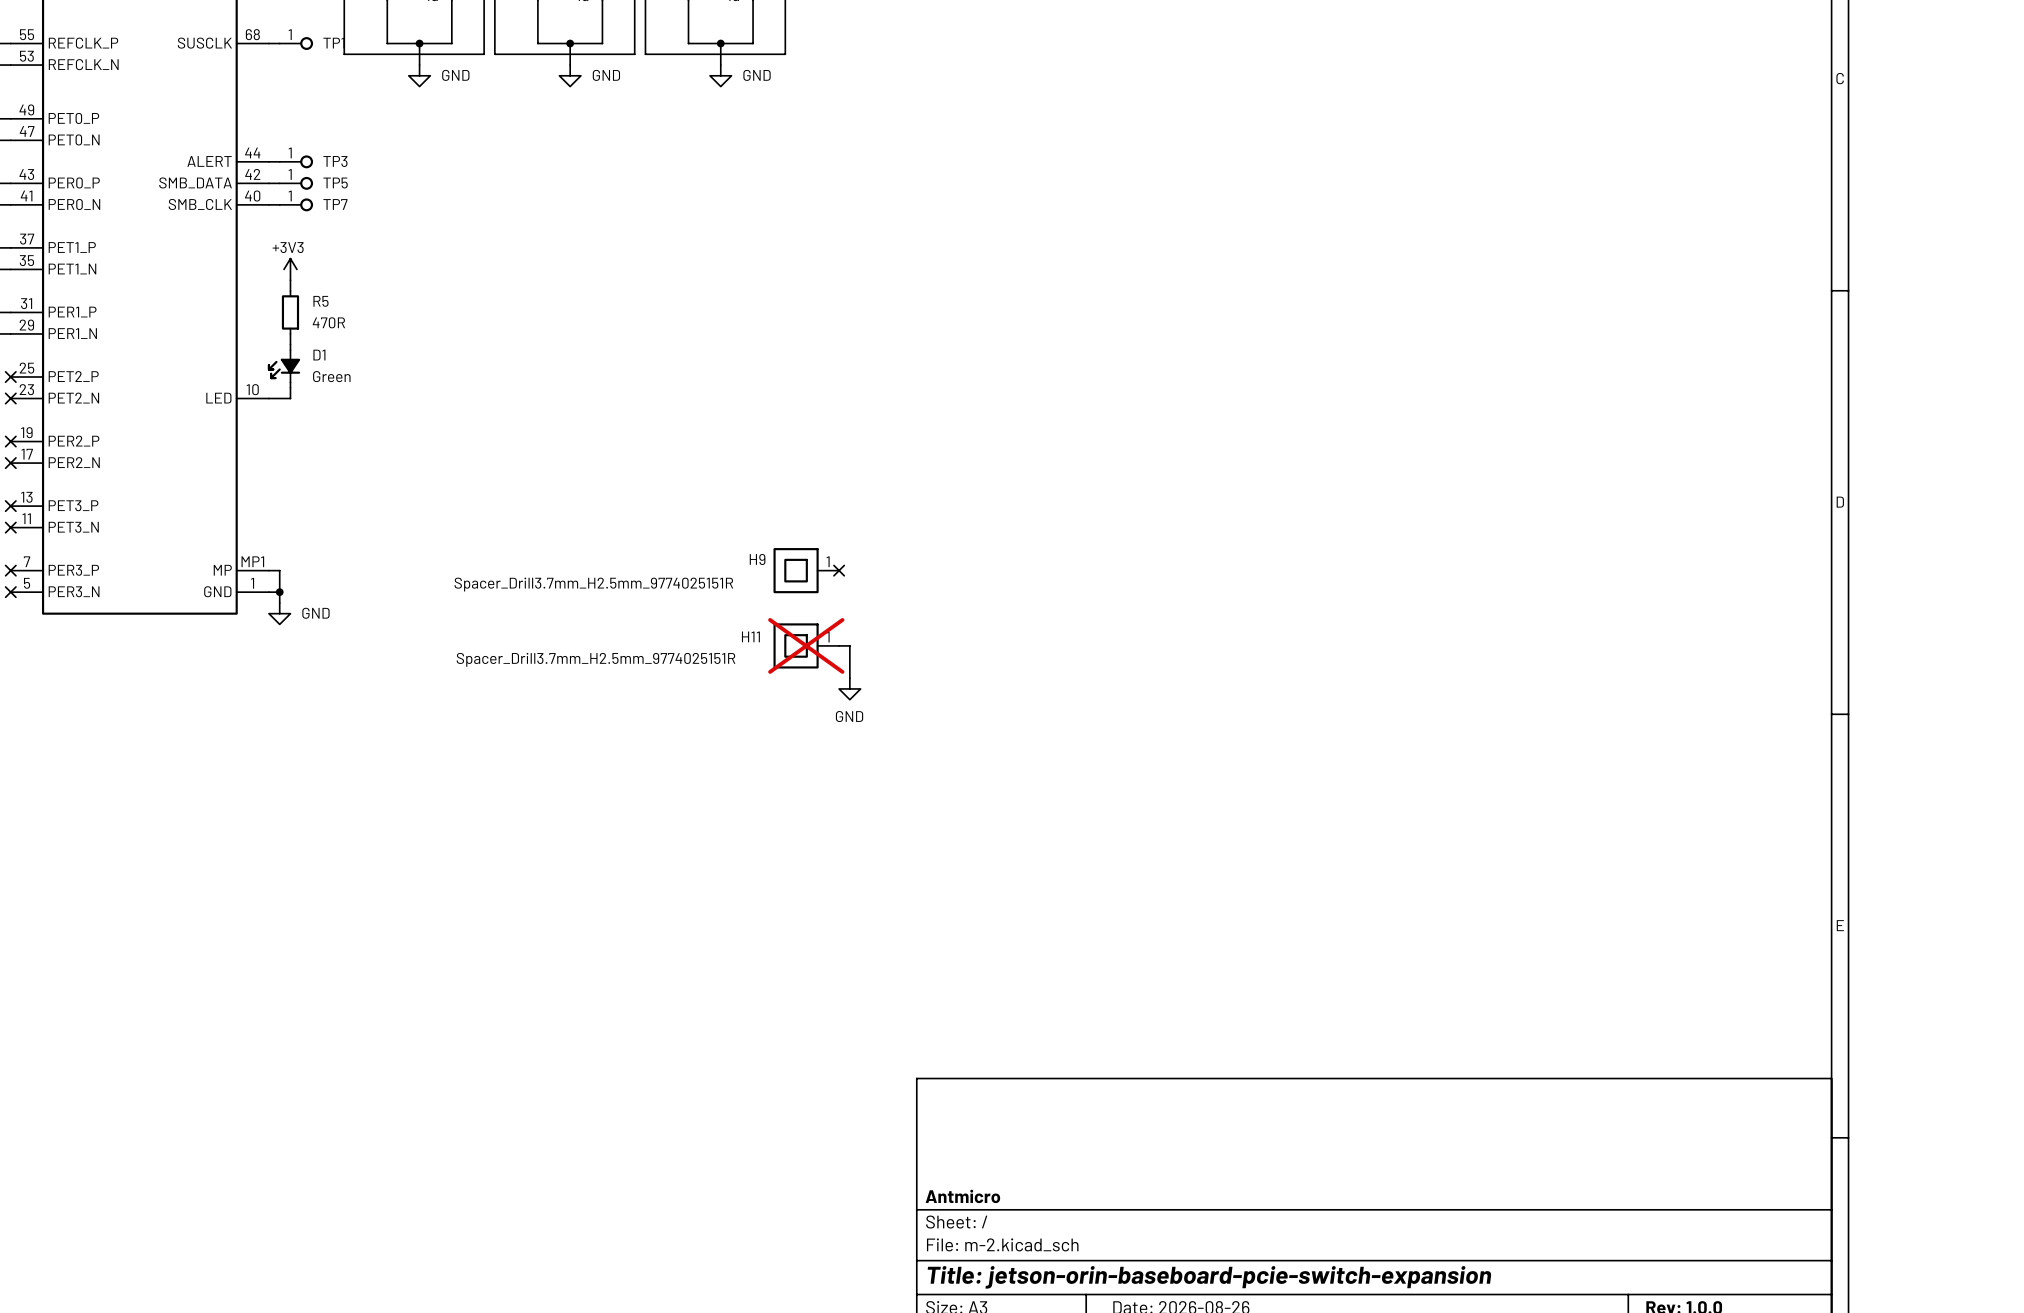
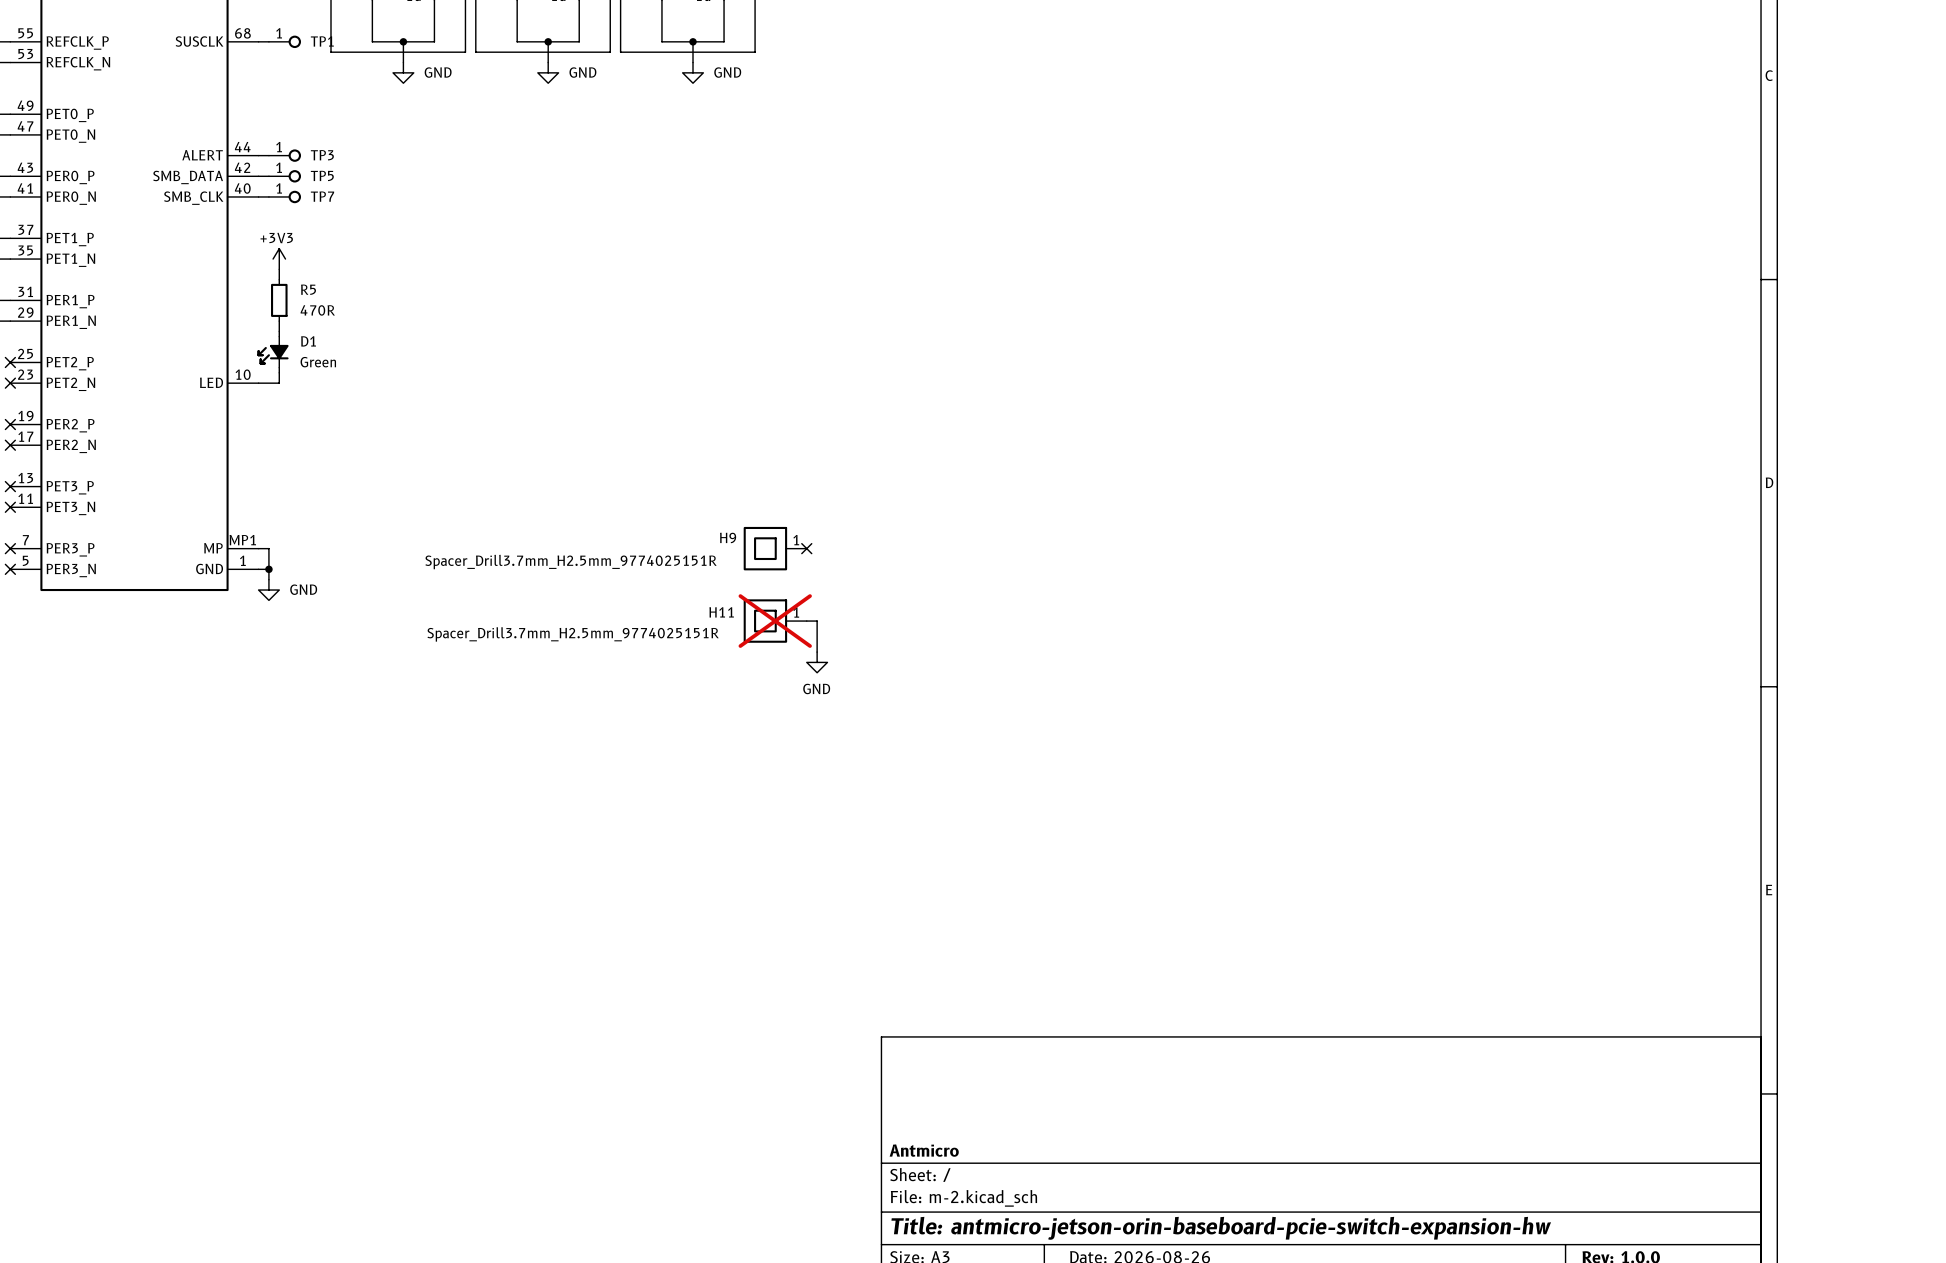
title block: Title: jetson-orin-baseboard-pcie-switch-expansion (1209, 1277) -> Title: antmicro-jetson-orin-baseboard-pcie-switch-expansion-hw (1221, 1228)

